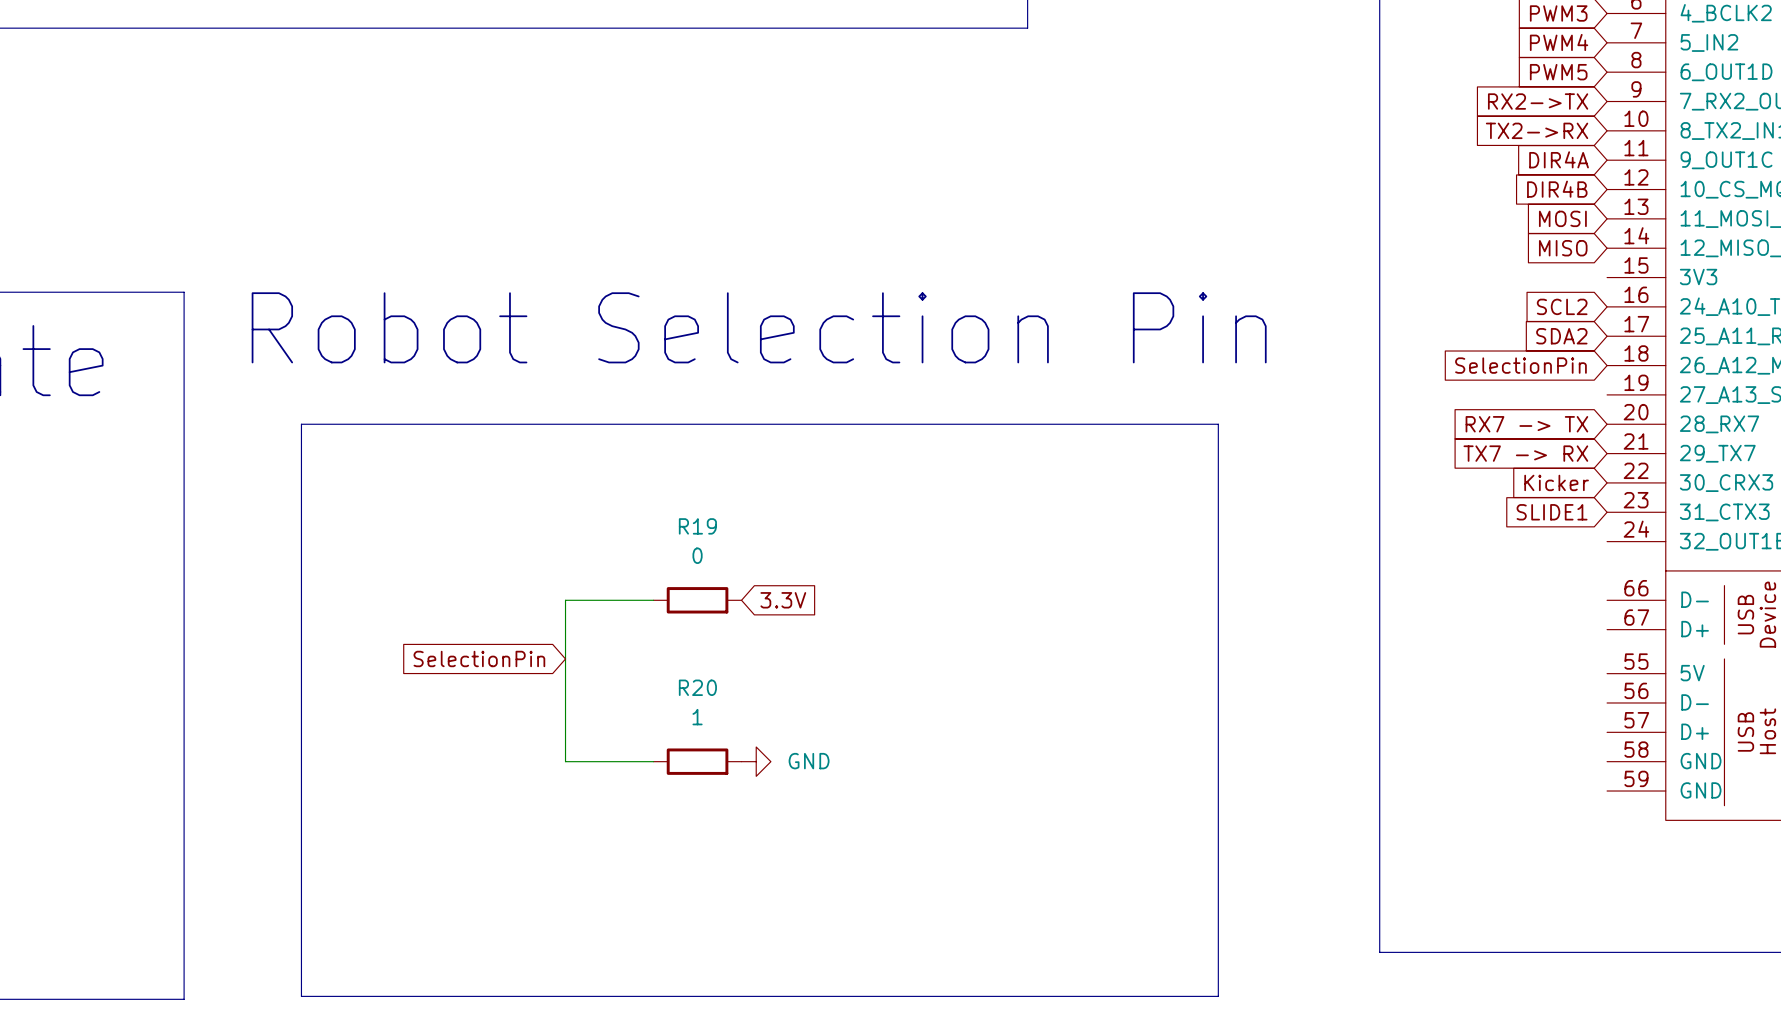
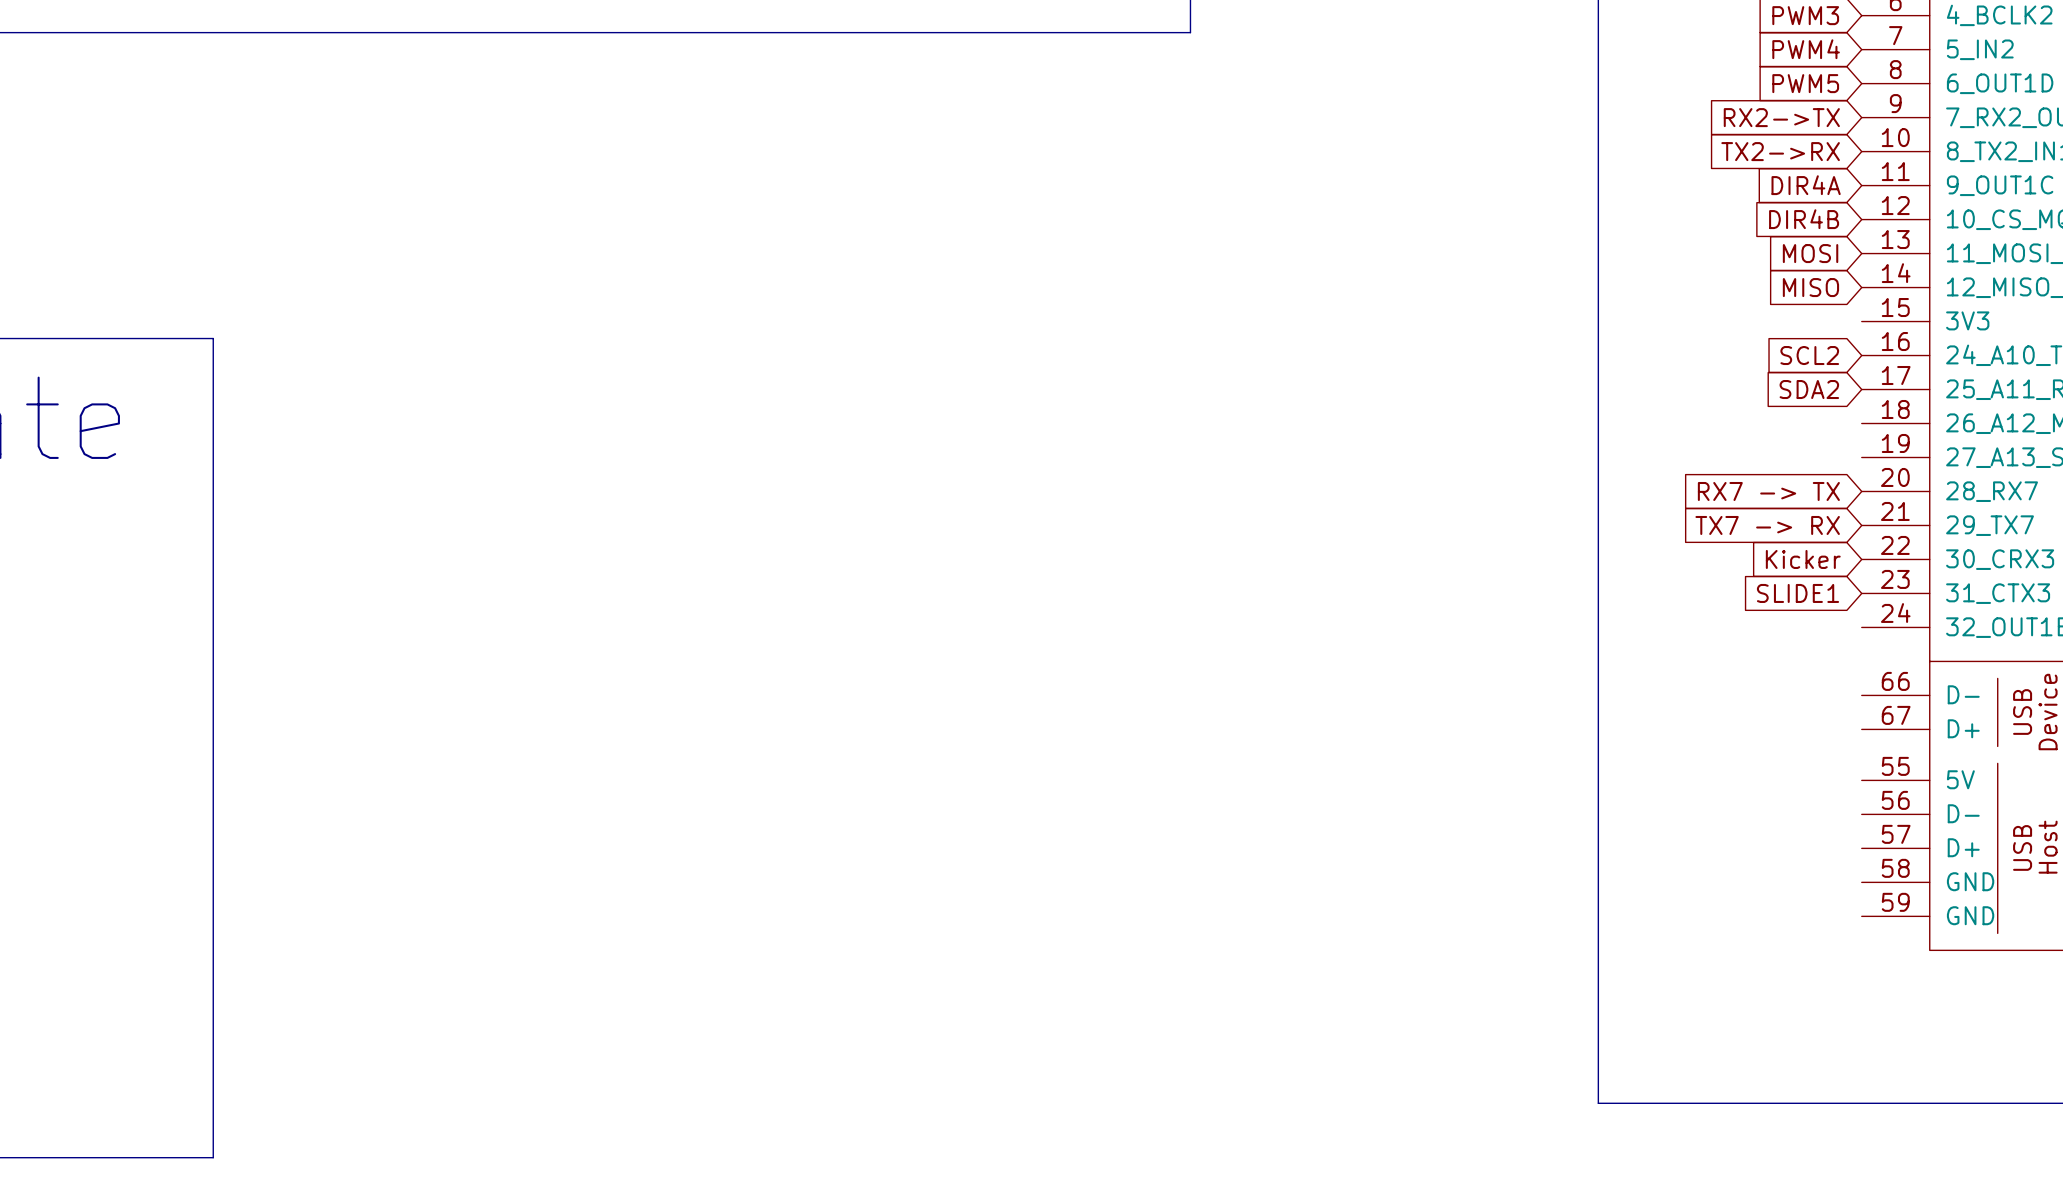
text: Robot Selection Pin (759, 327) -> none
global label: SelectionPin (1520, 365) -> none
line: (301, 424) (1218, 424) (1218, 996) (301, 996) (301, 424) -> none
wire: (653, 600) (565, 600) (565, 761) (653, 761) -> none
R19: 0 (697, 600) -> none
global label: 3.3V (783, 600) -> none
global label: SelectionPin (479, 658) -> none
R20: 1 (697, 761) -> none
power symbol: GND (756, 761) -> none

